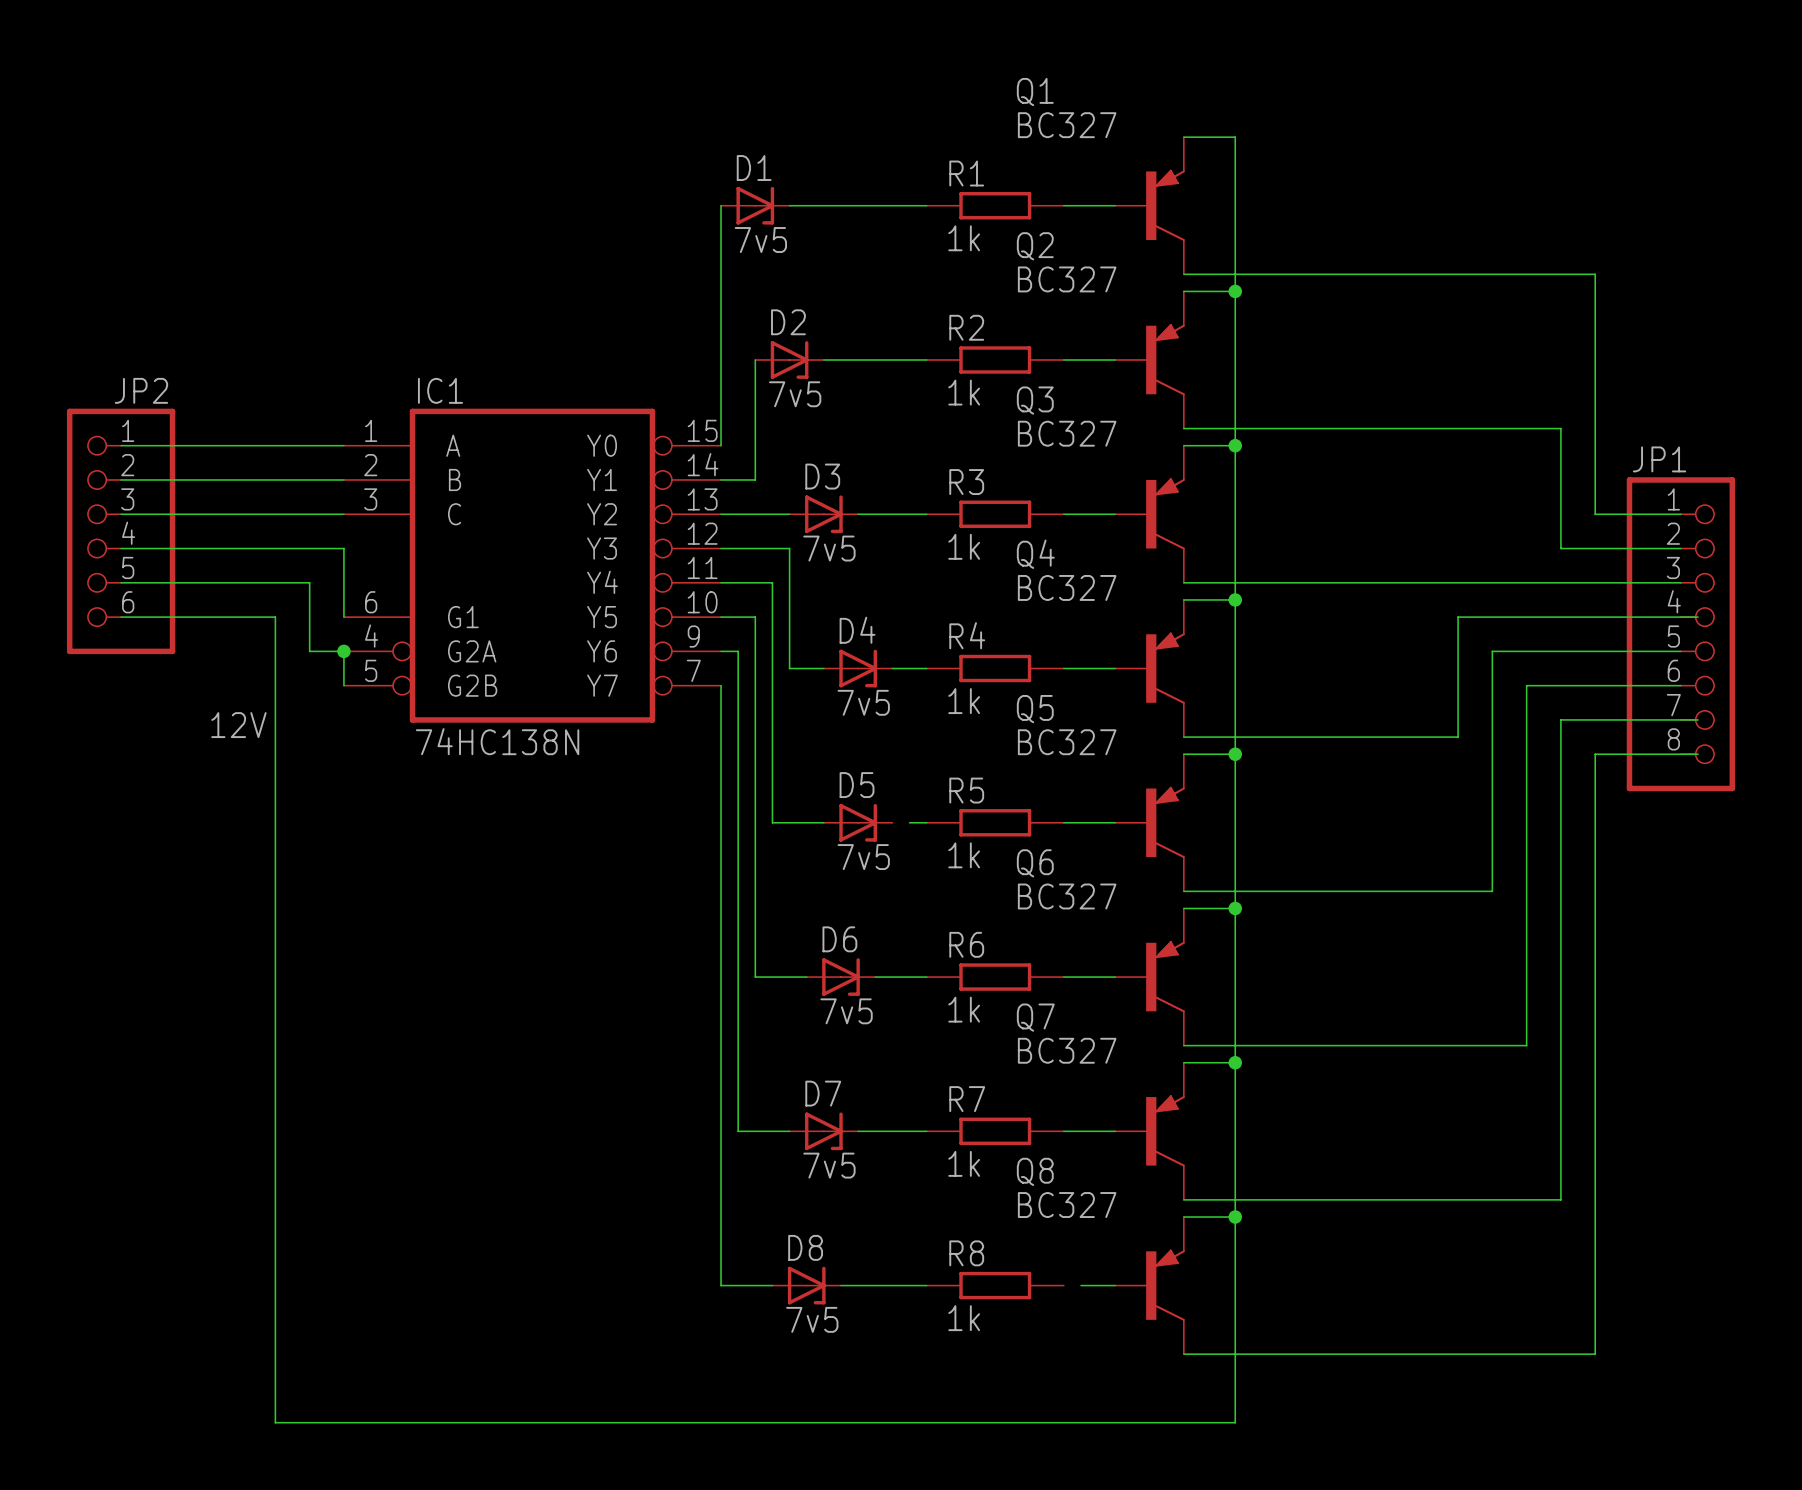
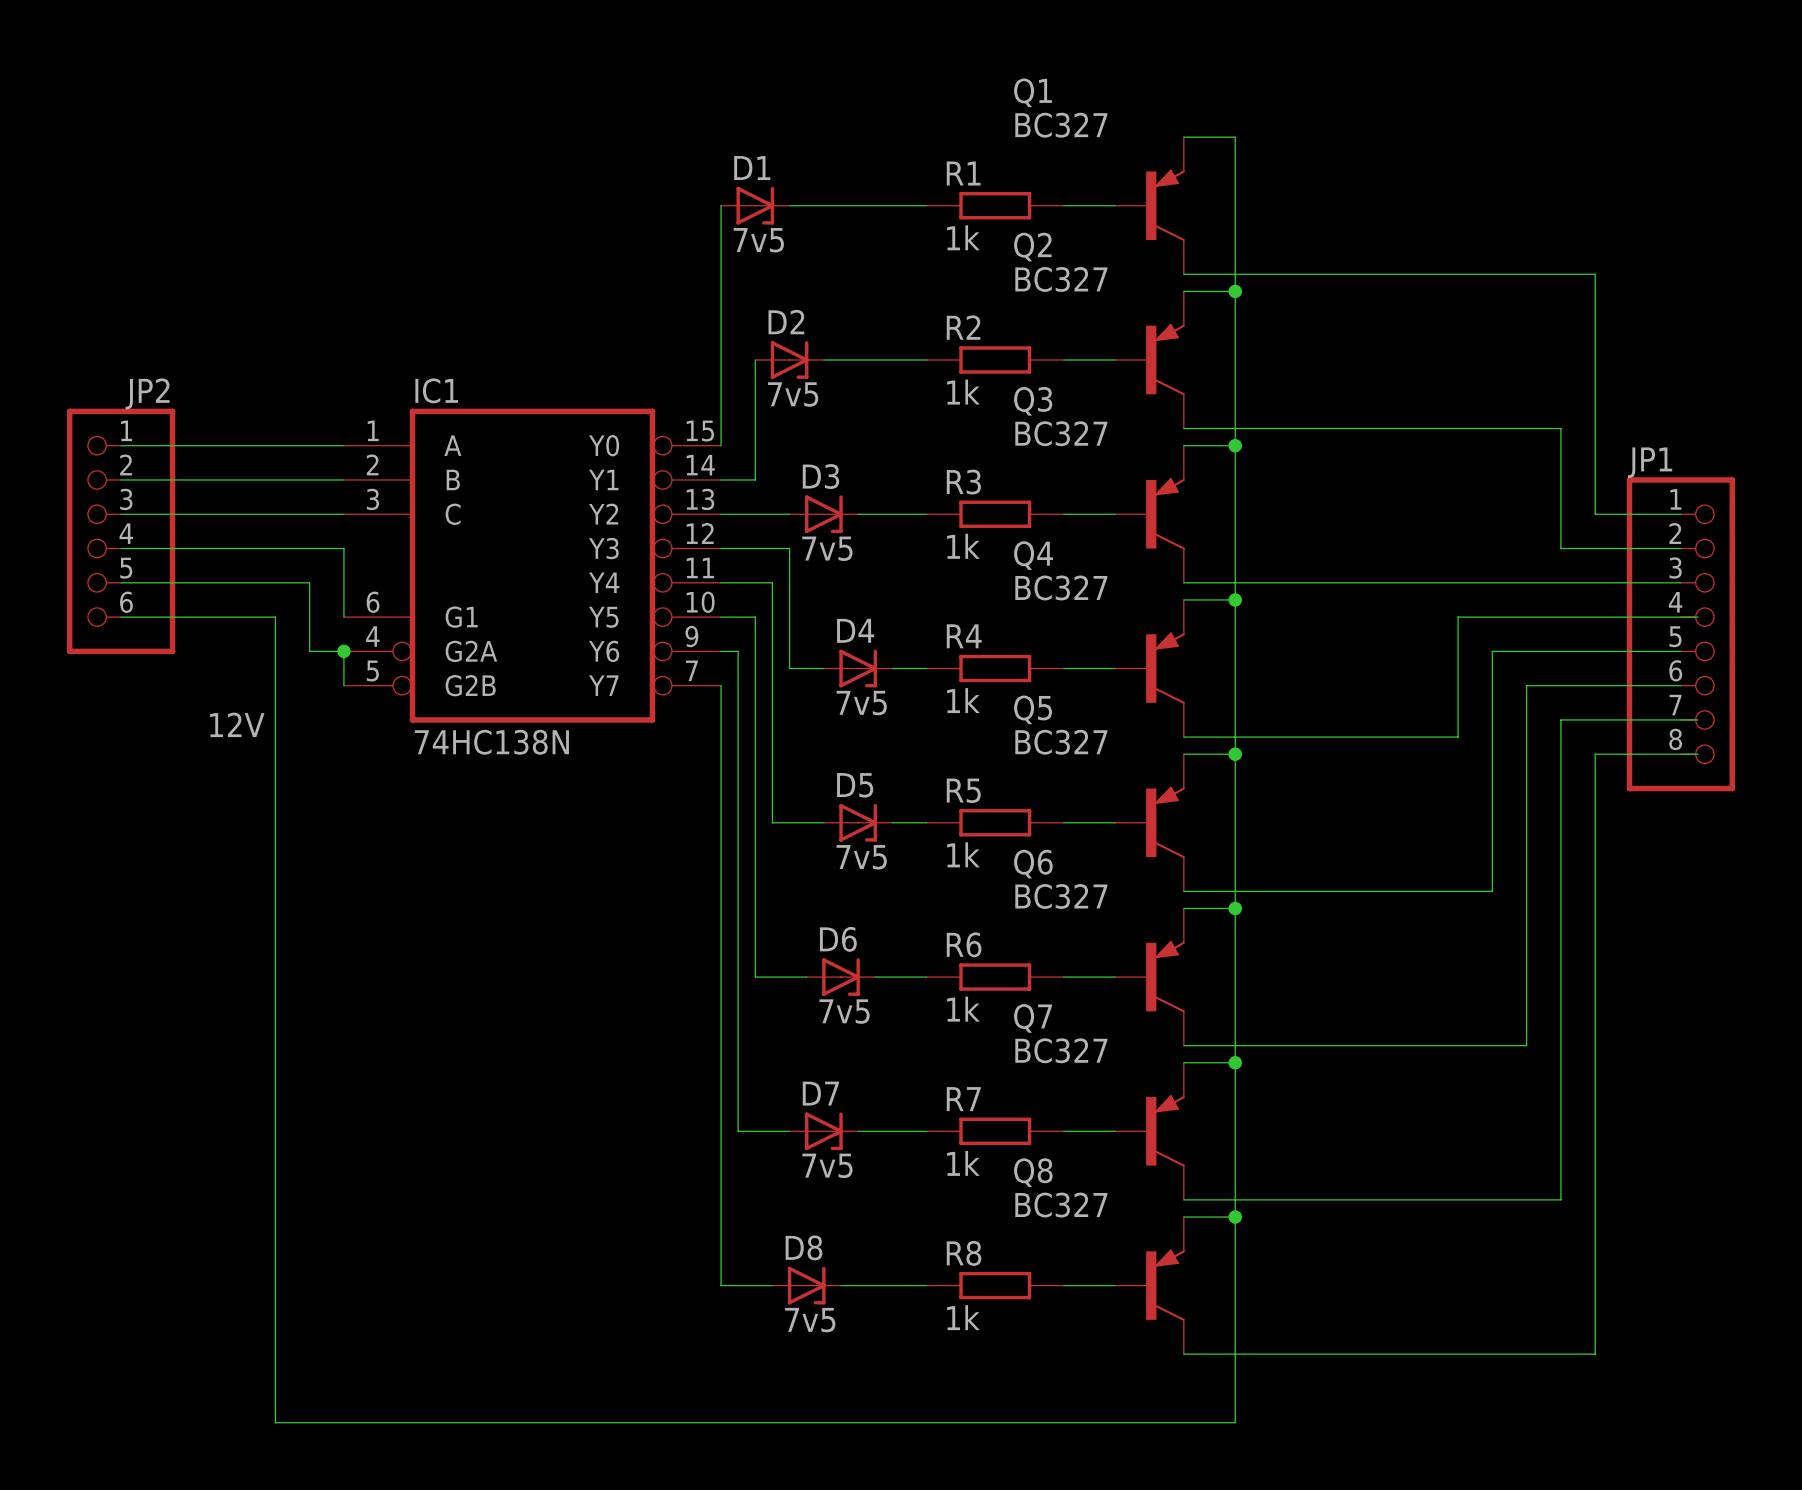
wire: none -> (892, 822) (909, 822)
wire: none -> (1063, 1285) (1080, 1285)

